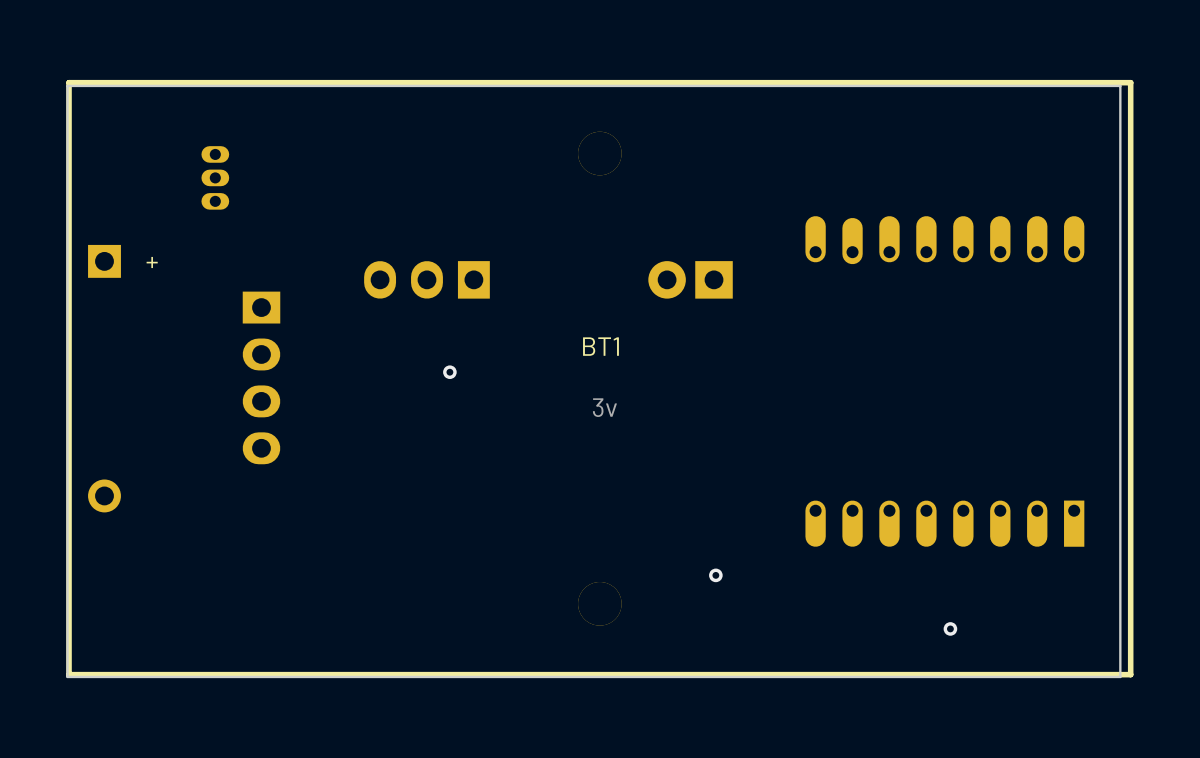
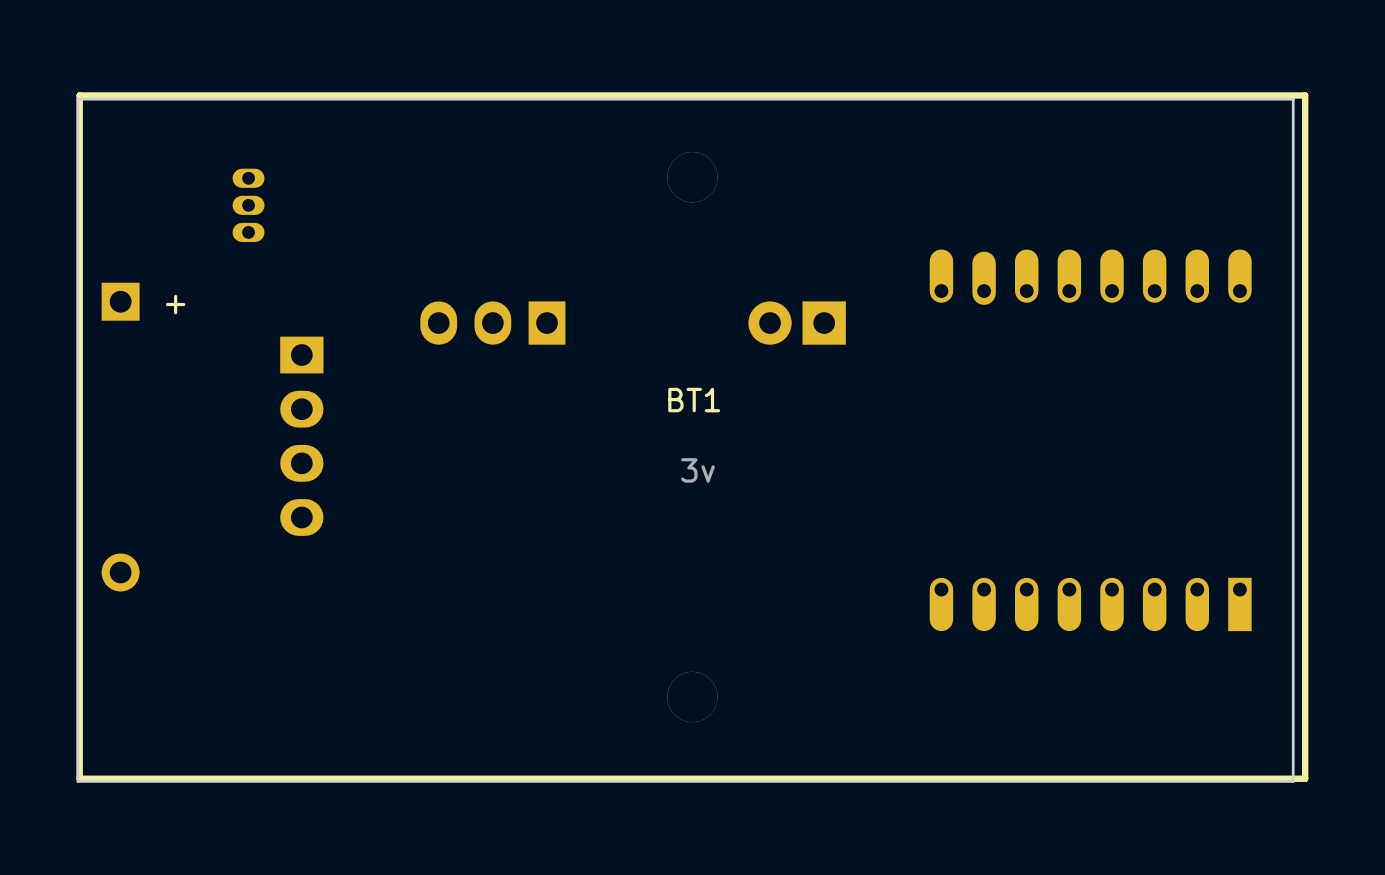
via: (449, 372) -> none
via: (715, 575) -> none
via: (950, 628) -> none

